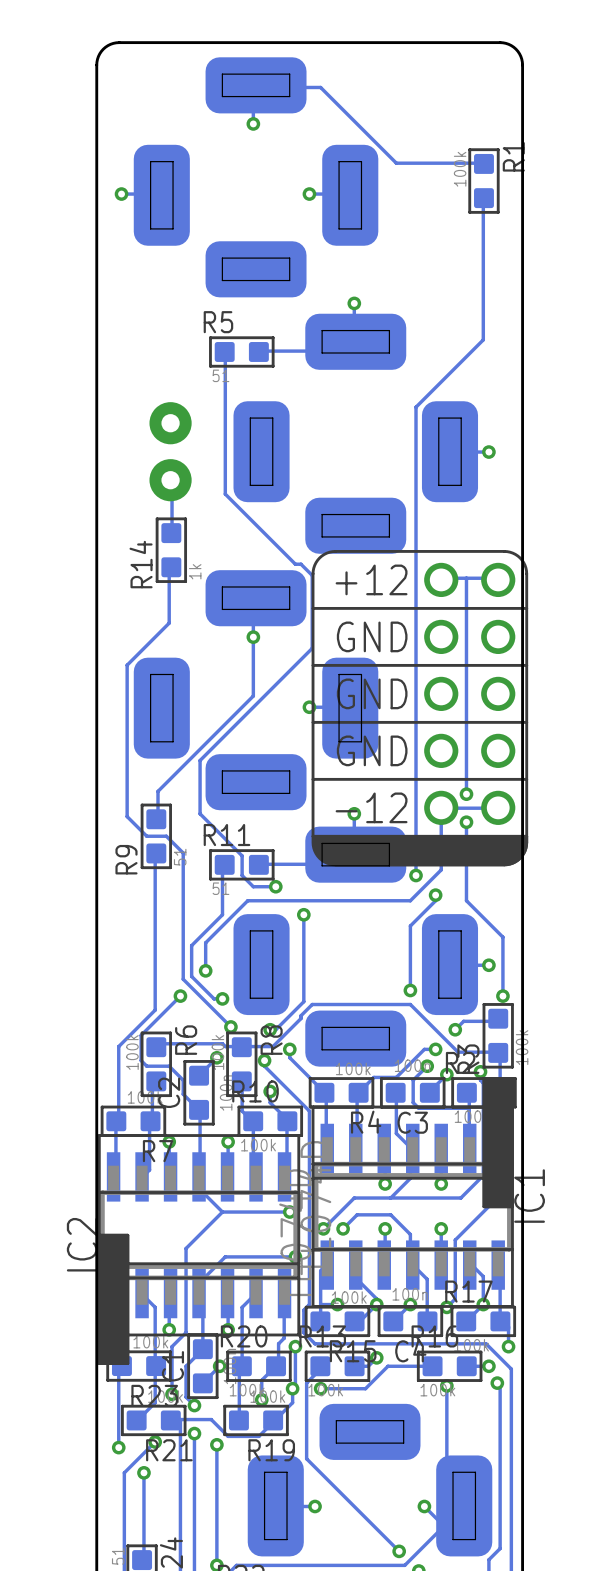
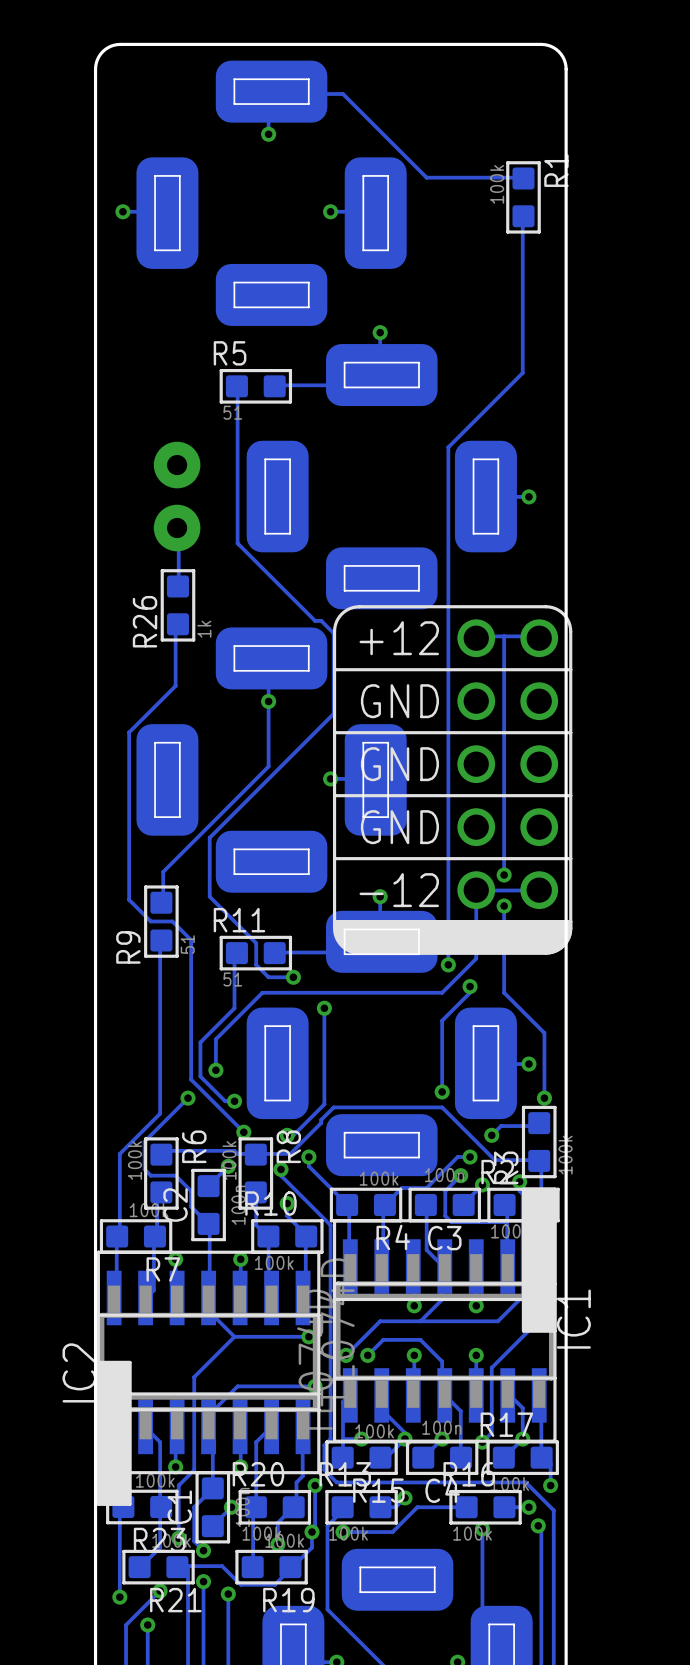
R14 name: R14 (141, 564) -> R26 (145, 621)

